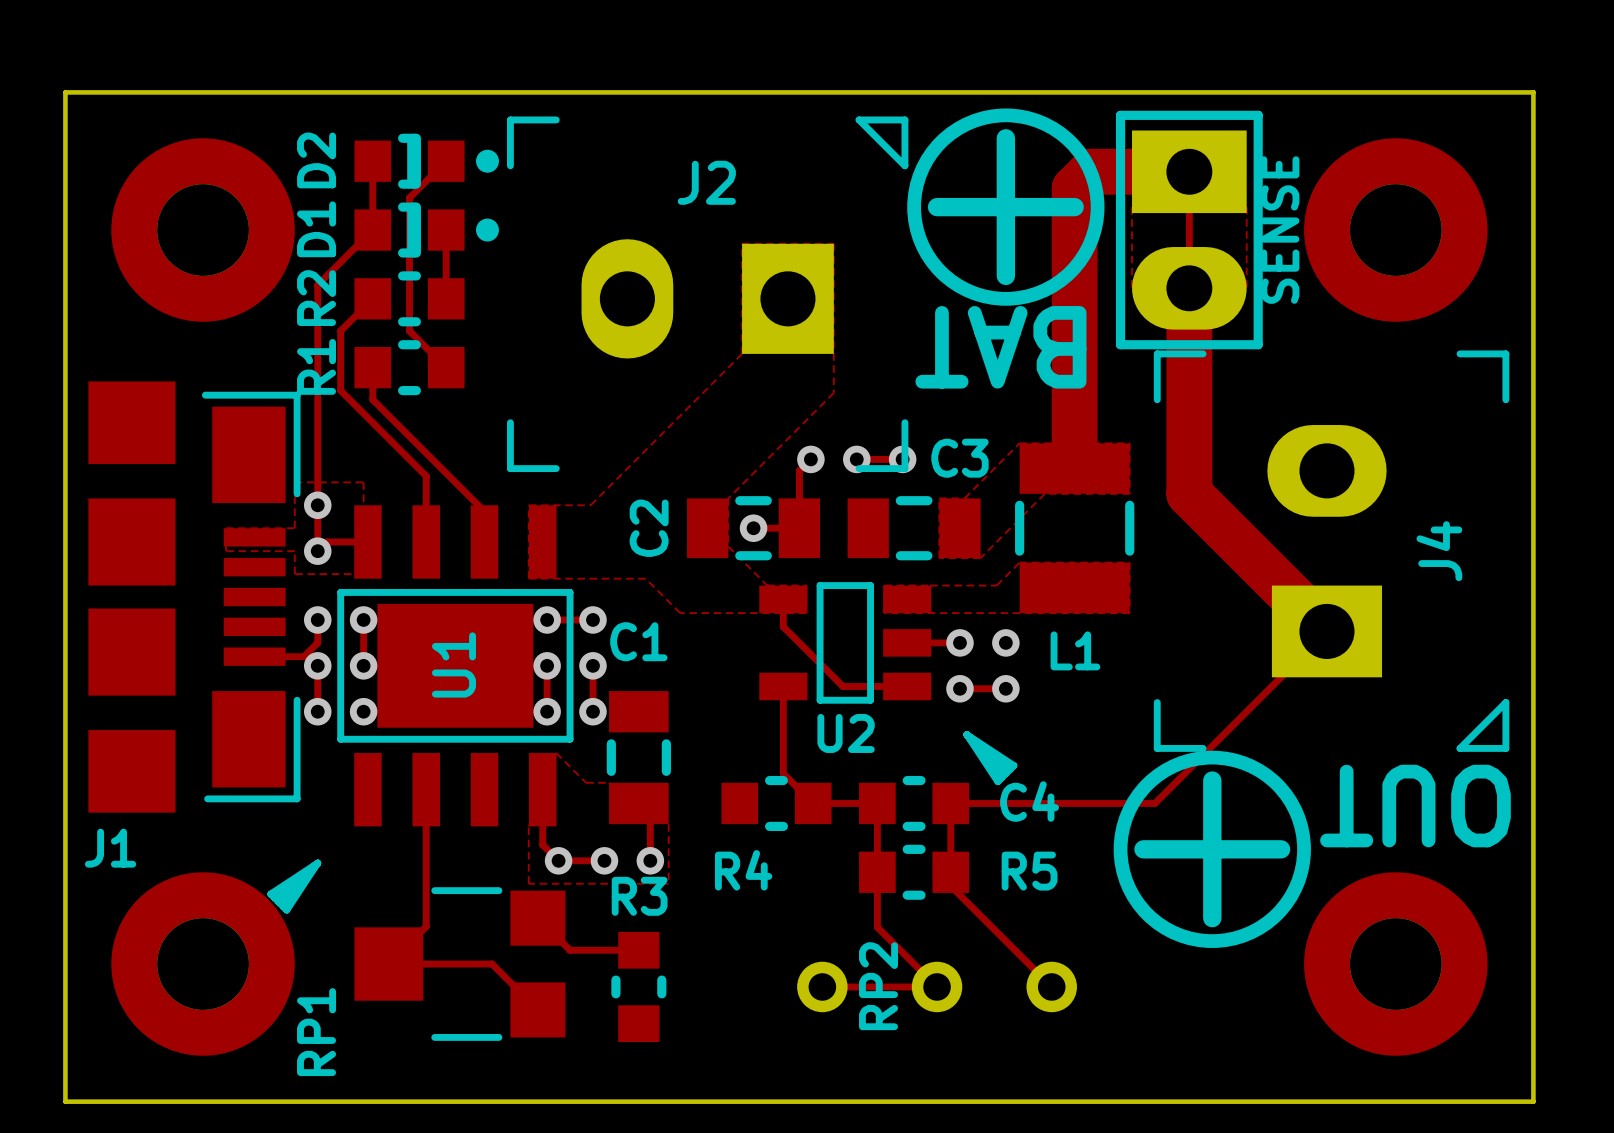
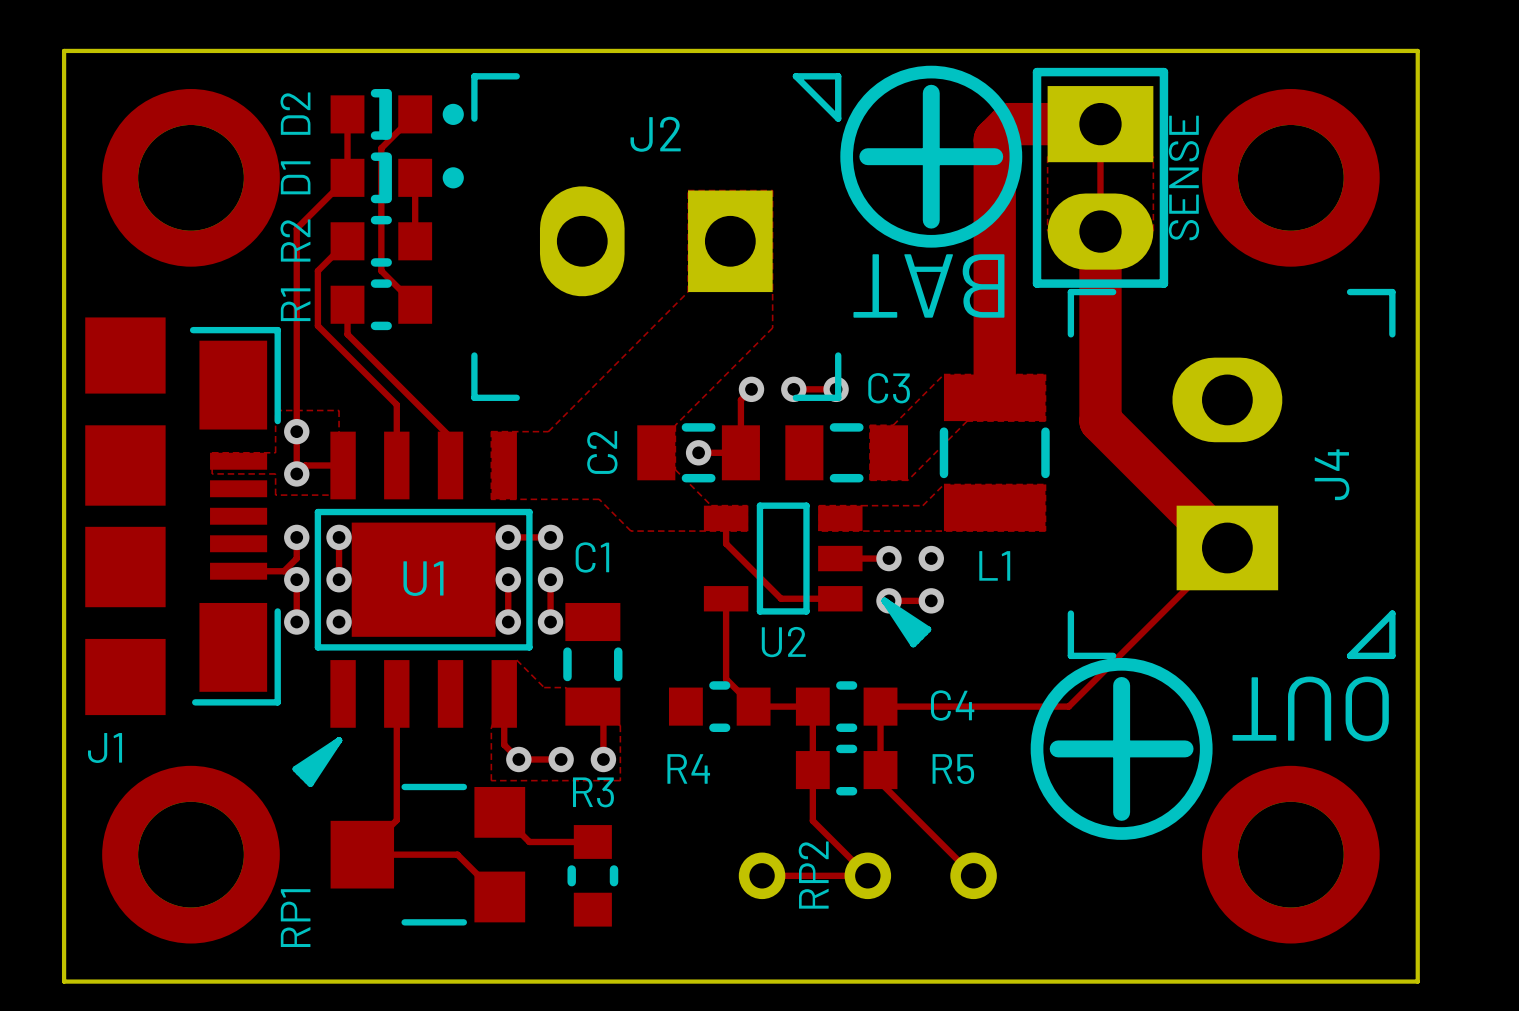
part footprint: [111, 138, 295, 322] -> [102, 89, 280, 267]
part footprint: [1304, 138, 1488, 322] -> [1202, 89, 1380, 267]
U1 footprint: [267, 505, 574, 914] -> [292, 431, 533, 787]
U2 footprint: [759, 582, 1018, 786] -> [703, 502, 932, 648]
part footprint: [111, 872, 295, 1056] -> [102, 765, 280, 944]
part footprint: [1304, 872, 1488, 1056] -> [1202, 765, 1380, 944]

